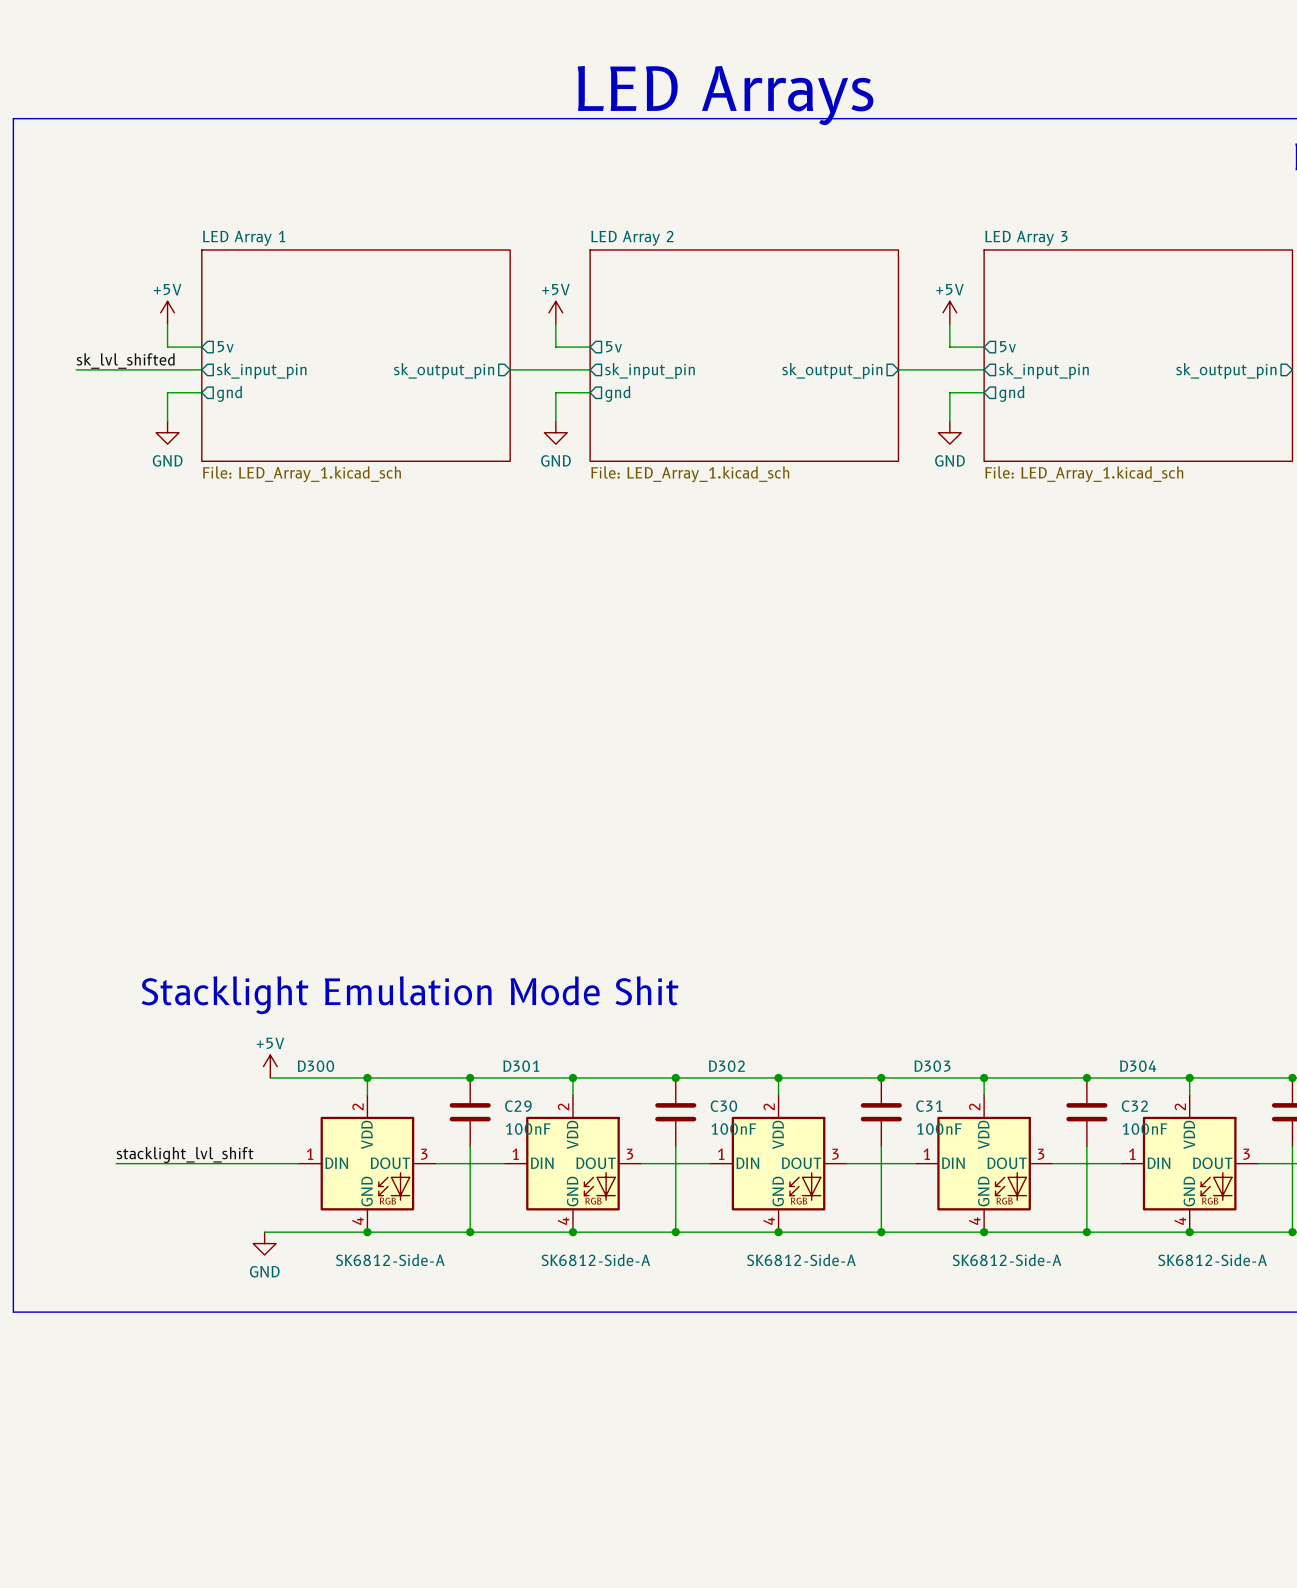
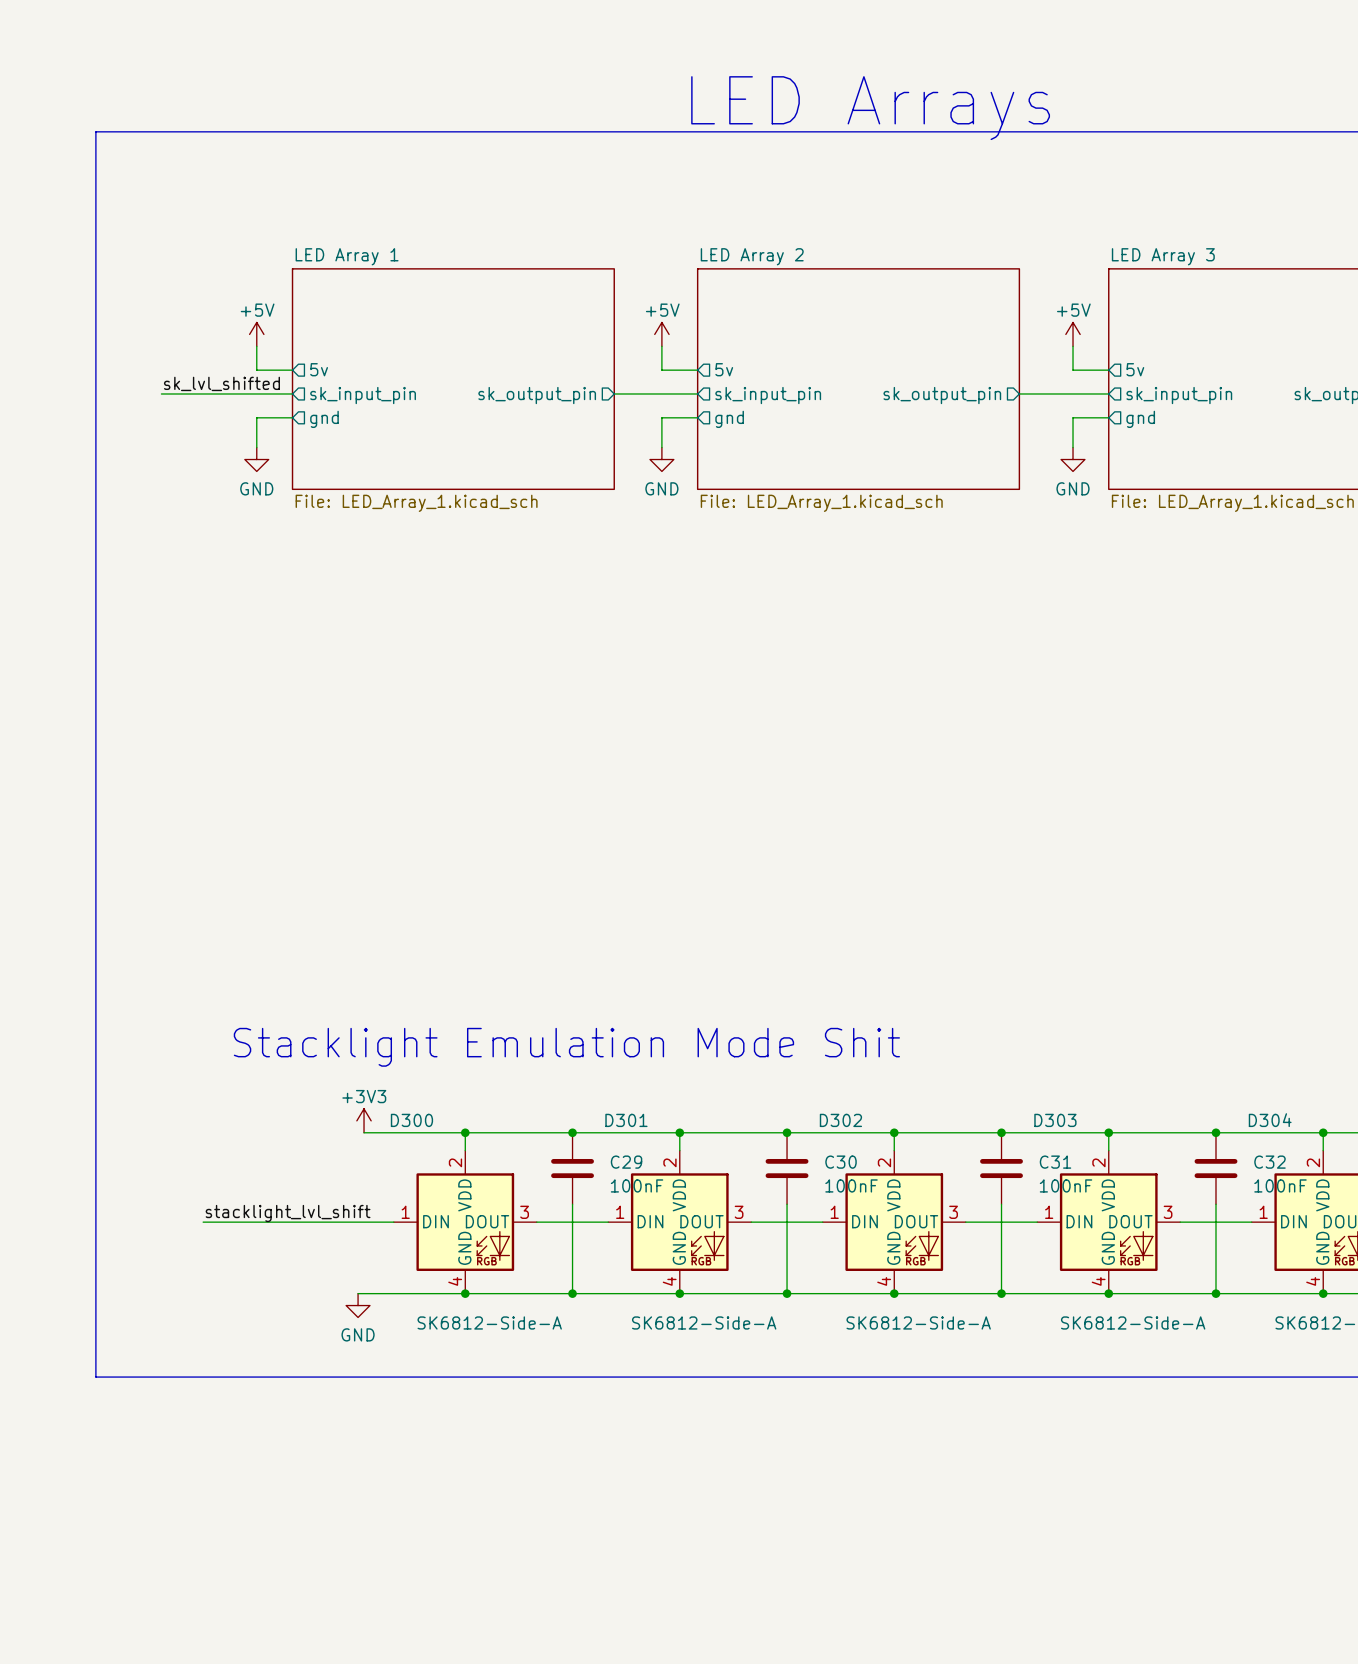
power symbol: +5V (270, 1066) -> +3V3 (364, 1120)

